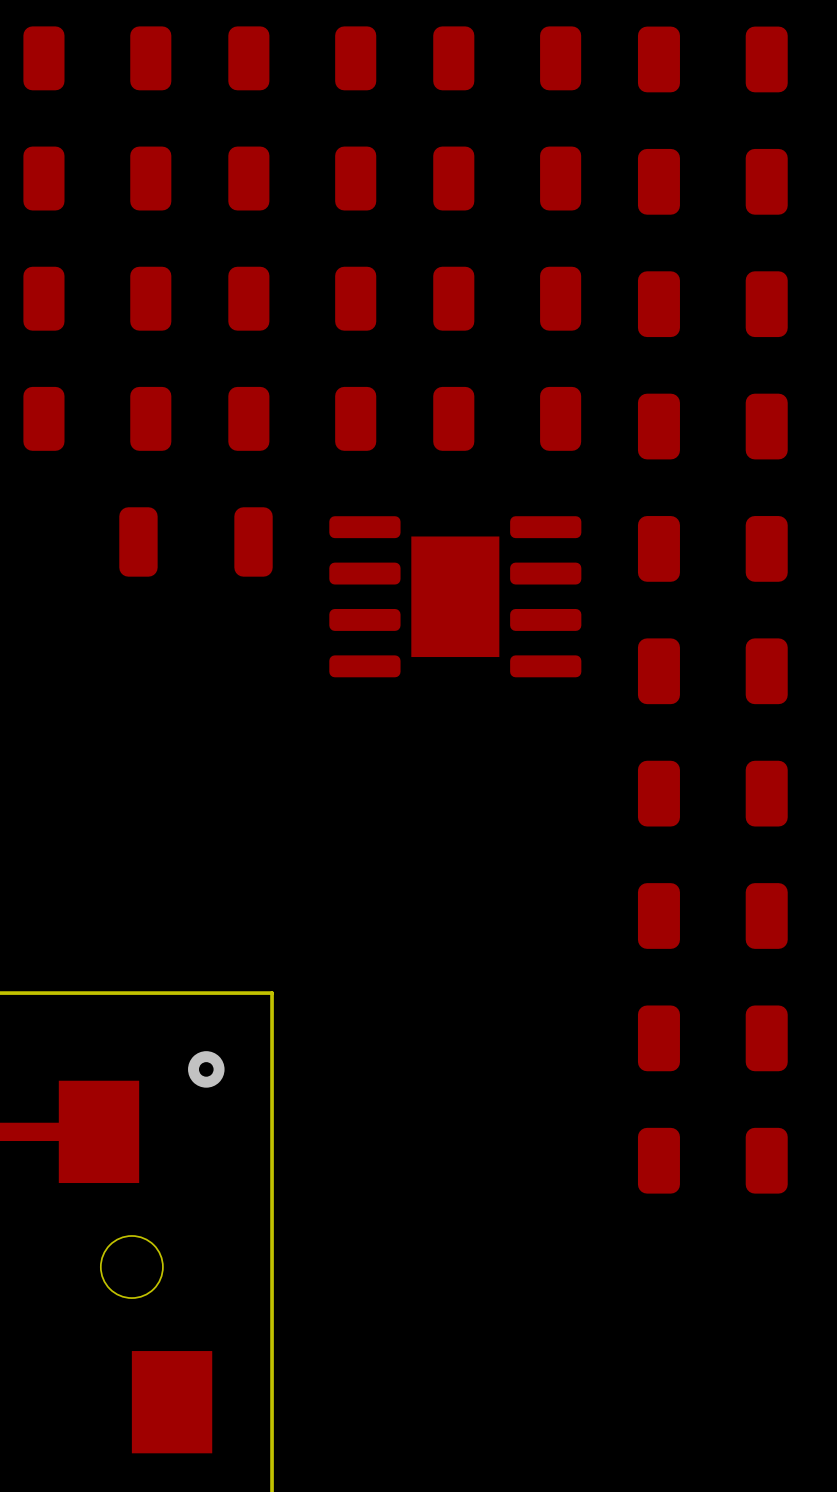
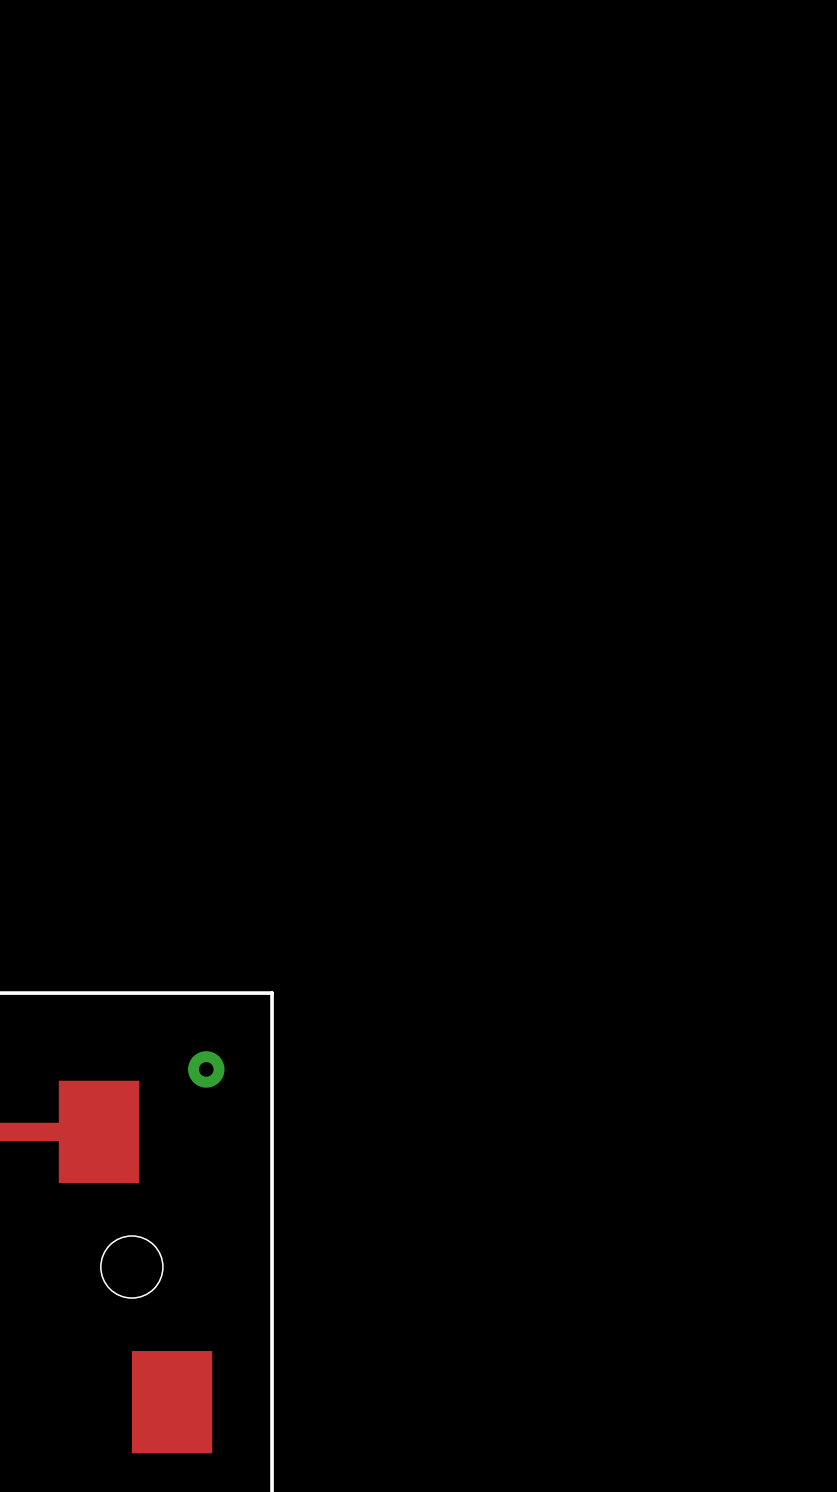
part: (97, 58) -> none
part: (302, 58) -> none
part: (507, 58) -> none
part: (712, 59) -> none
part: (97, 178) -> none
part: (302, 178) -> none
part: (507, 178) -> none
part: (712, 181) -> none
part: (97, 298) -> none
part: (302, 298) -> none
part: (507, 298) -> none
part: (712, 304) -> none
part: (97, 418) -> none
part: (302, 418) -> none
part: (507, 418) -> none
part: (712, 426) -> none
part: (195, 541) -> none
part: (712, 548) -> none
part: (455, 596) -> none
part: (712, 671) -> none
part: (712, 793) -> none
part: (712, 915) -> none
part: (712, 1038) -> none
part: (712, 1160) -> none

